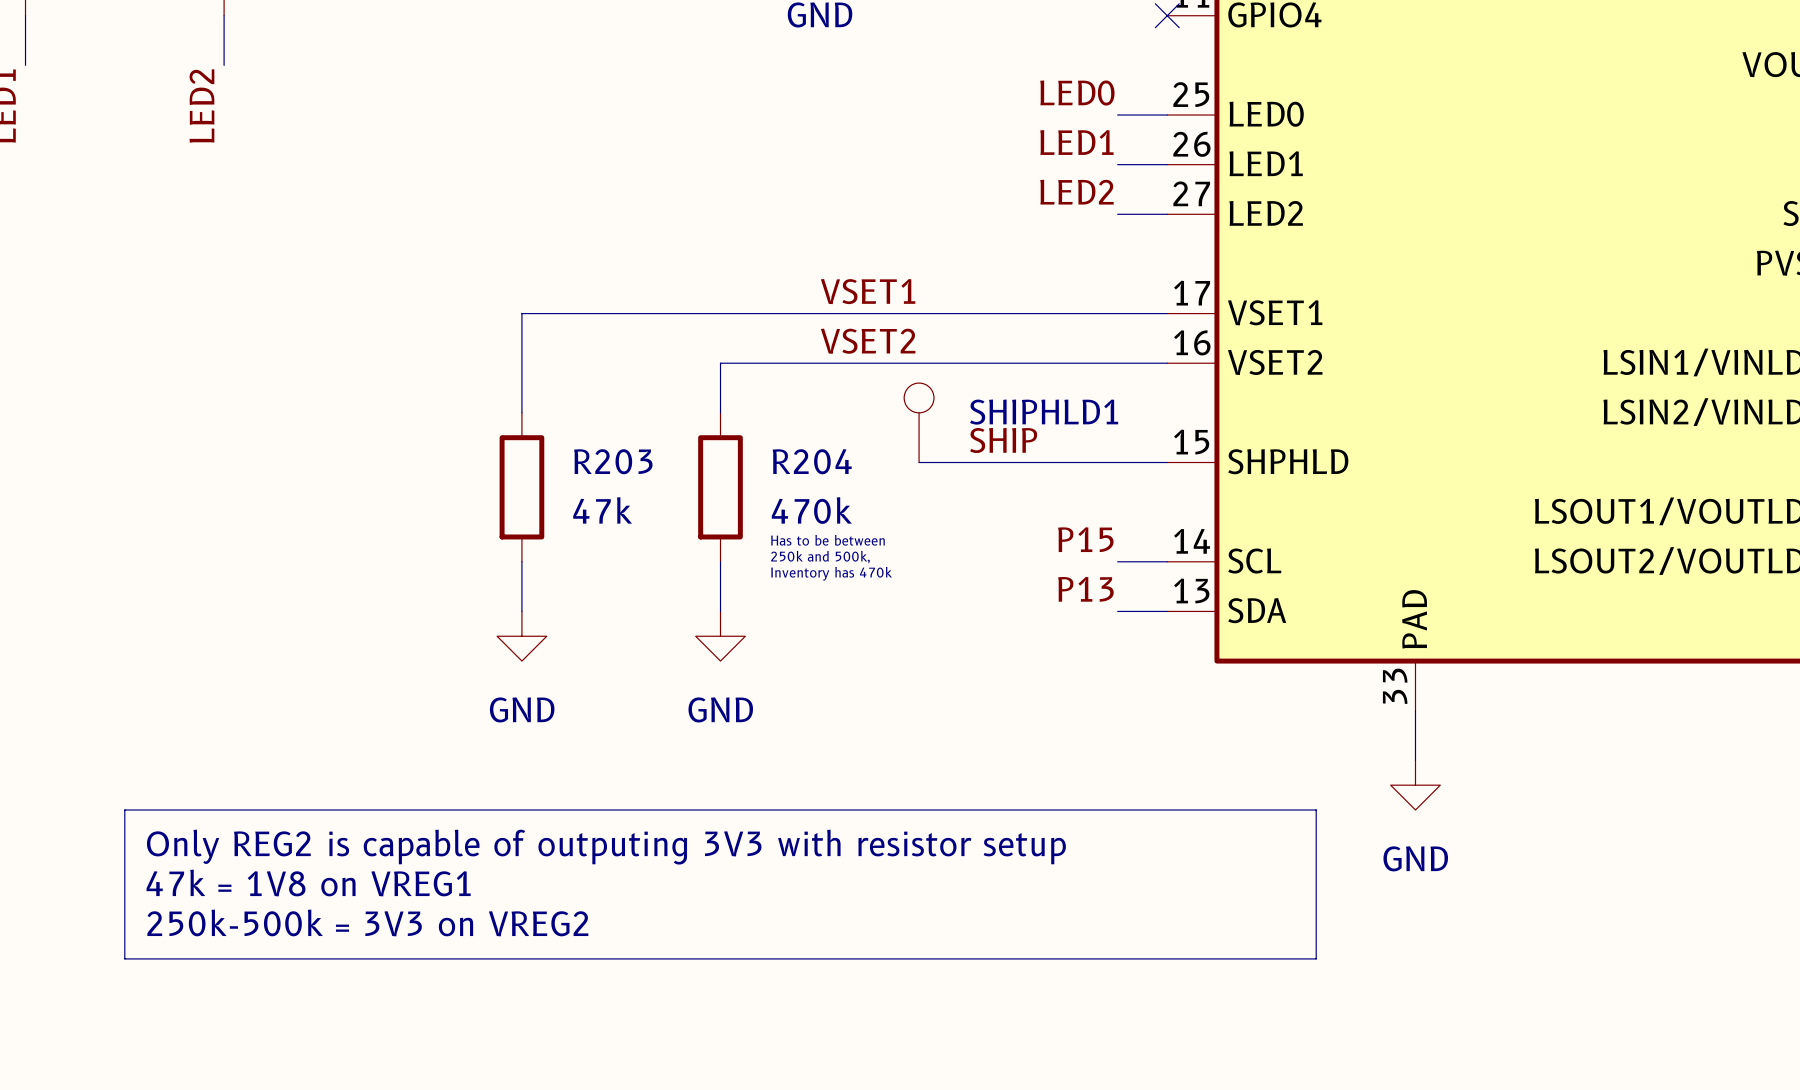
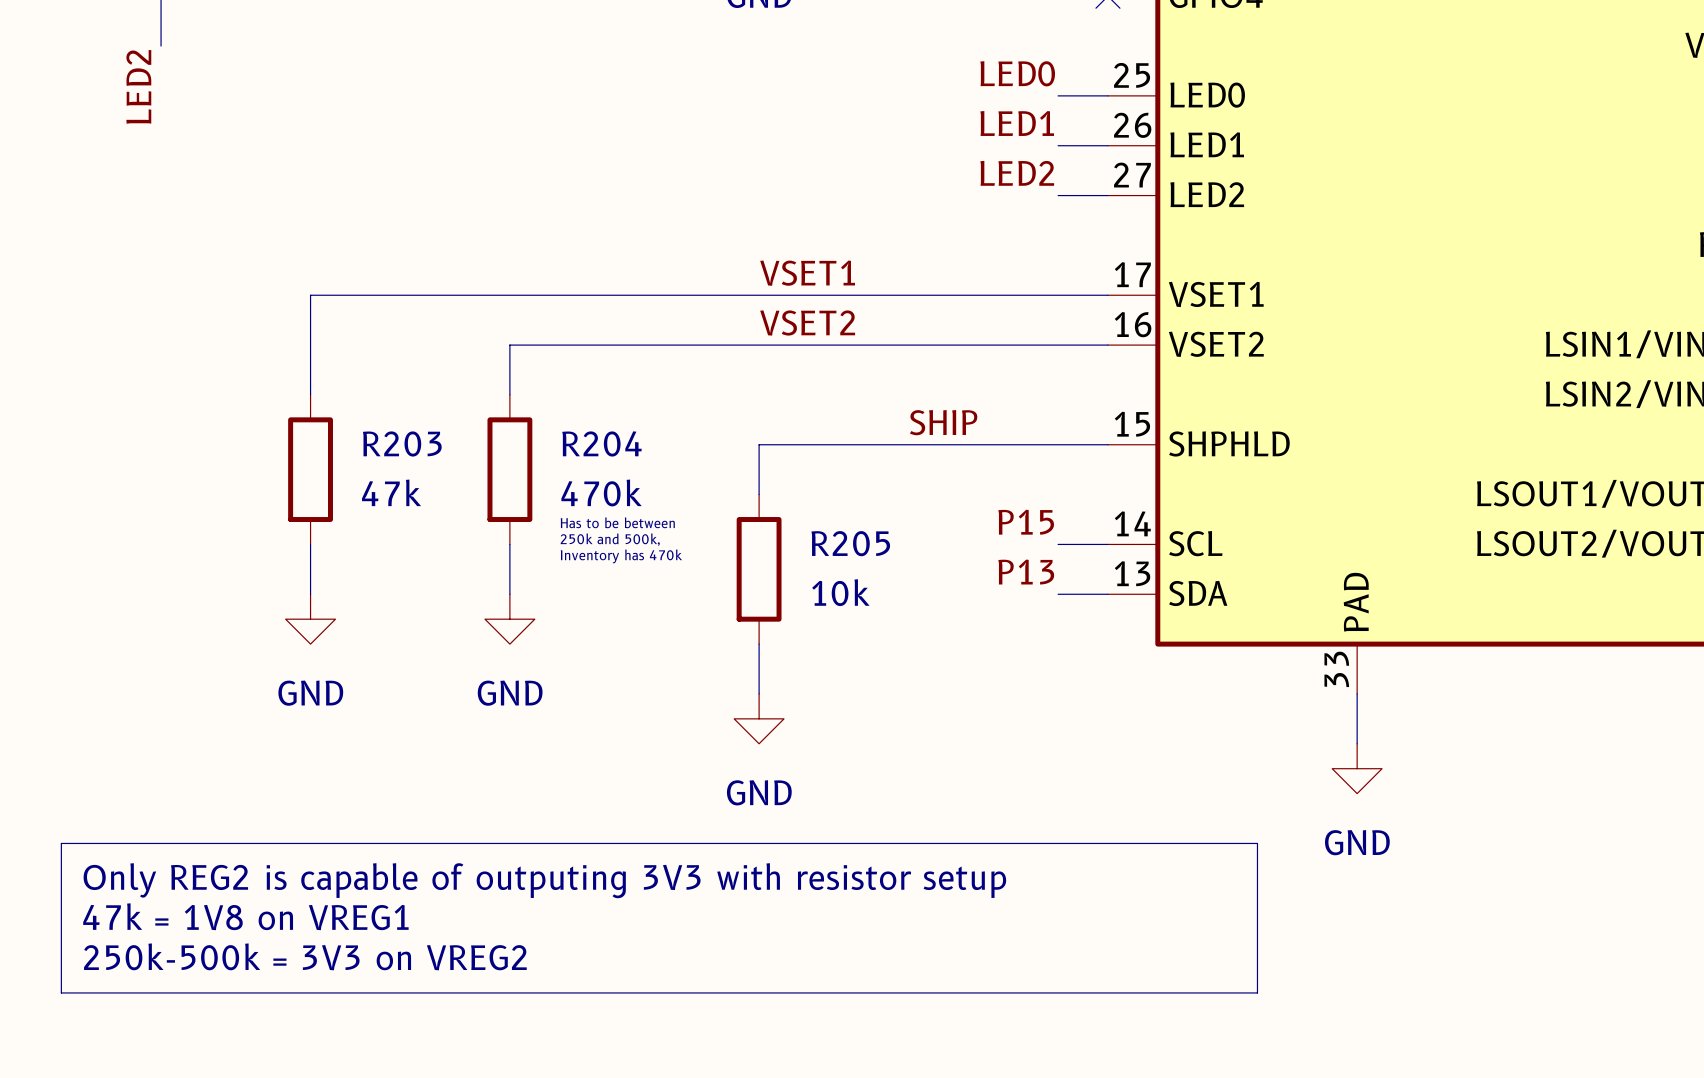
wire: (521, 313) (521, 412) -> (460, 295) (310, 295) (310, 394)
wire: (720, 363) (720, 412) -> (659, 345) (509, 345) (509, 394)
SHIPHLD1: (919, 422) -> none
wire: none -> (858, 444) (759, 444) (759, 494)
R203 position: (521, 487) -> (310, 469)
R204 position: (720, 487) -> (509, 469)
text position: Has to be between (827, 540) -> Has to be between (617, 522)
text position: 250k and 500k, (820, 557) -> 250k and 500k, (610, 539)
wire: (521, 561) (521, 611) -> (310, 544) (310, 594)
wire: (720, 561) (720, 611) -> (509, 544) (509, 594)
text position: Inventory has 470k (831, 573) -> Inventory has 470k (621, 556)
R205: none -> 10k (759, 569)
power symbol: none -> GND (310, 619)
power symbol position: GND (521, 636) -> GND (509, 619)
power symbol: GND (720, 636) -> none
wire: none -> (759, 644) (759, 693)
power symbol: none -> GND (759, 718)
text position: Only REG2 is capable of outputing 3V3 with resistor setup (606, 847) -> Only REG2 is capable of outputing 3V3 with resistor setup (544, 880)
line: (124, 859) (124, 810) (1316, 810) (1316, 859) -> (61, 843) (1257, 843)
text position: 47k = 1V8 on VREG1 (308, 883) -> 47k = 1V8 on VREG1 (245, 916)
text position: 250k-500k = 3V3 on VREG2 (367, 922) -> 250k-500k = 3V3 on VREG2 (305, 956)
line: (124, 958) (1316, 958) -> (61, 943) (61, 992) (1257, 992) (1257, 943)

